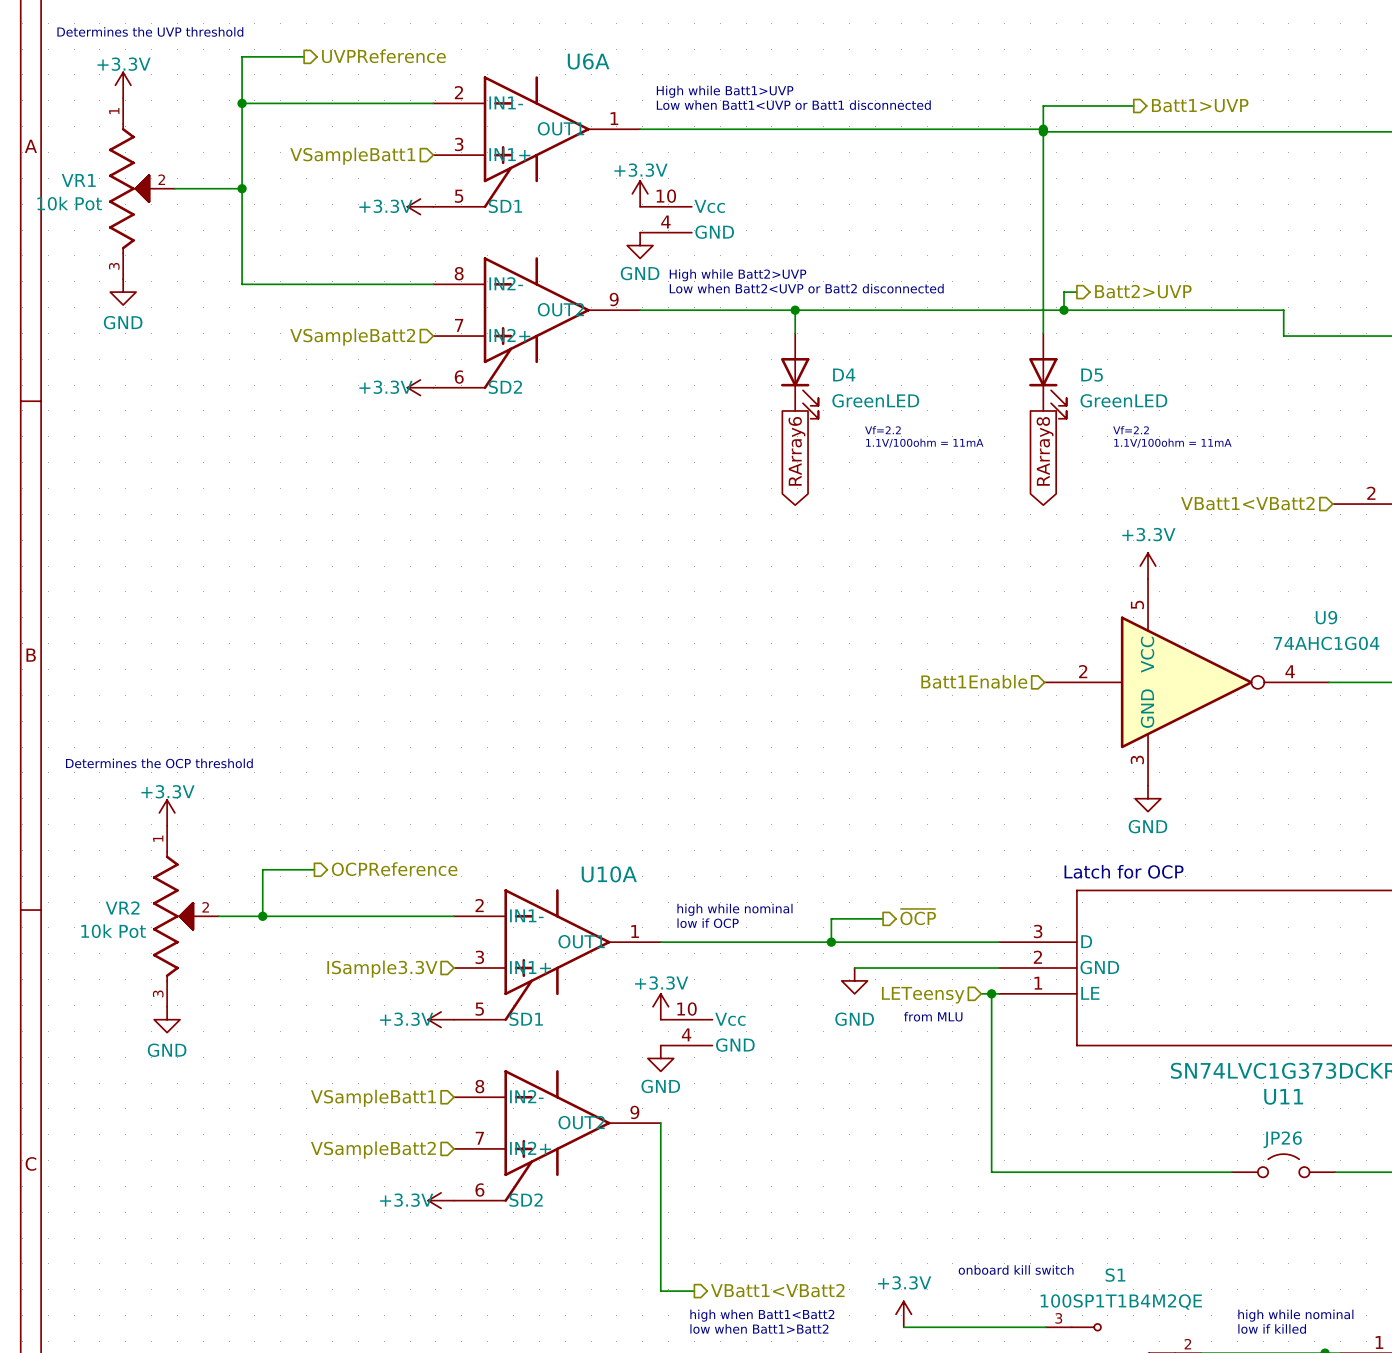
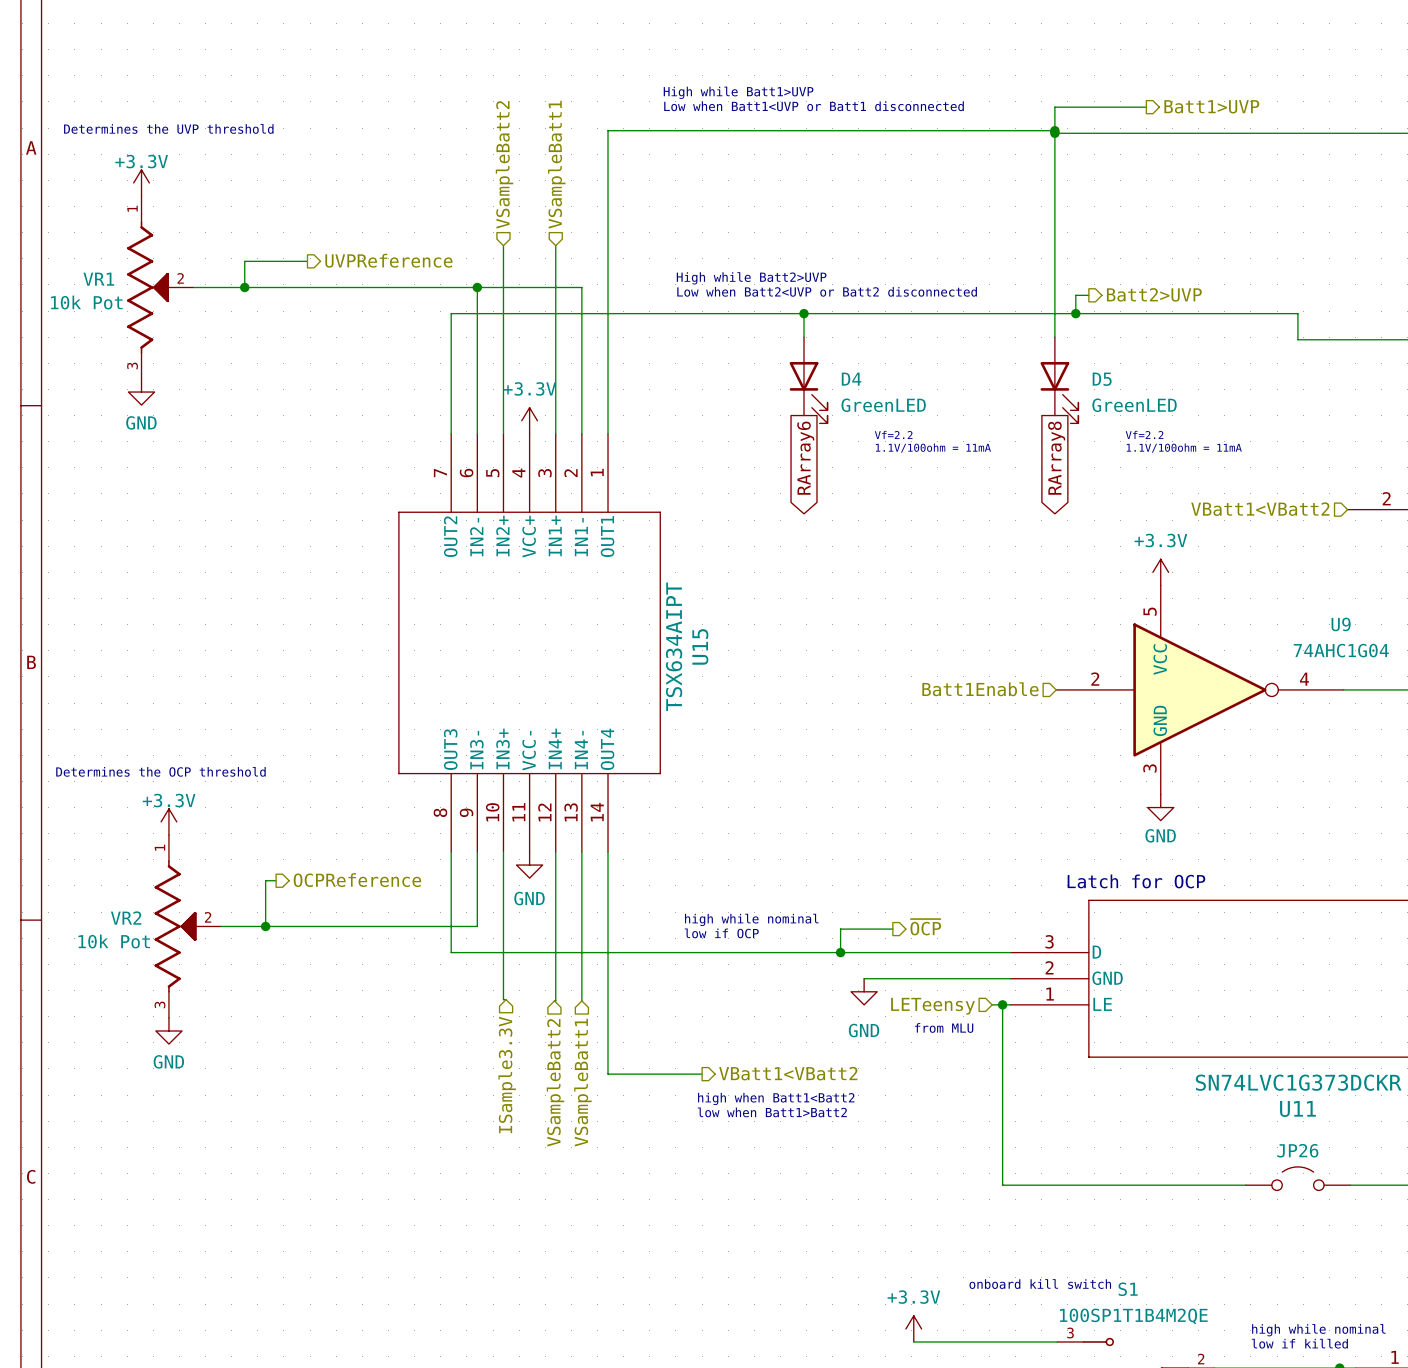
text position: Determines the UVP threshold (150, 31) -> Determines the UVP threshold (168, 128)
wire: (304, 56) (242, 56) (242, 258) -> (307, 261) (244, 261)
hierarchical label position: UVPReference (383, 56) -> UVPReference (388, 260)
power symbol position: +3.3V (123, 85) -> +3.3V (141, 182)
wire: (242, 103) (433, 103) -> none
junction: (242, 103) -> none
wire: none -> (647, 130) (608, 130) (608, 433)
hierarchical label rotation: 0° (352, 156) -> 90° clockwise (556, 164)
hierarchical label position: VSampleBatt1 (352, 156) -> VSampleBatt1 (556, 164)
VR1 position: (141, 188) -> (160, 287)
wire: (174, 188) (242, 188) -> none
junction: (242, 188) -> none
power symbol: +3.3V (640, 193) -> none
power symbol: +3.3V (420, 206) -> none
U6A: (562, 232) -> none
wire: none -> (503, 245) (503, 433)
wire: none -> (555, 245) (555, 433)
power symbol: GND (640, 245) -> none
wire: none -> (193, 287) (244, 287)
junction: none -> (244, 287)
wire: none -> (438, 287) (581, 287) (581, 433)
wire: none -> (477, 287) (477, 433)
junction: none -> (477, 287)
power symbol position: GND (123, 292) -> GND (141, 392)
wire: none -> (647, 313) (451, 313) (451, 433)
hierarchical label rotation: 0° (352, 337) -> 90° clockwise (504, 164)
hierarchical label position: VSampleBatt2 (352, 337) -> VSampleBatt2 (504, 164)
power symbol rotation: 0° (420, 387) -> 90° clockwise (529, 420)
power symbol position: +3.3V (420, 387) -> +3.3V (529, 420)
U15: none -> TSX634AIPT (529, 642)
wire: none -> (451, 851) (451, 952) (668, 952)
wire: none -> (477, 851) (477, 926) (459, 926)
wire: none -> (503, 851) (503, 999) (506, 999)
wire: none -> (555, 851) (554, 1000)
wire: none -> (581, 851) (581, 1000)
wire: none -> (608, 851) (608, 1074) (702, 1074)
wire: (314, 869) (262, 871) -> (276, 880) (265, 880)
hierarchical label position: OCPReference (394, 869) -> OCPReference (357, 880)
hierarchical label rotation: 0° (382, 969) -> 90° counterclockwise (507, 1074)
hierarchical label position: ISample3.3V (382, 969) -> ISample3.3V (507, 1074)
power symbol: +3.3V (660, 1006) -> none
power symbol: +3.3V (441, 1019) -> none
U10A: (583, 1045) -> none
power symbol position: GND (660, 1058) -> GND (529, 865)
power symbol text position: GND (660, 1086) -> GND (529, 898)
hierarchical label rotation: 0° (373, 1098) -> 90° counterclockwise (582, 1082)
hierarchical label position: VSampleBatt1 (373, 1098) -> VSampleBatt1 (582, 1082)
wire: (660, 1123) (660, 1291) (694, 1291) -> none
hierarchical label rotation: 0° (373, 1150) -> 90° counterclockwise (555, 1082)
hierarchical label position: VSampleBatt2 (373, 1150) -> VSampleBatt2 (555, 1082)
power symbol: +3.3V (441, 1200) -> none
hierarchical label position: VBatt1<VBatt2 (777, 1290) -> VBatt1<VBatt2 (788, 1073)
text position: high when Batt1<Batt2 (762, 1315) -> high when Batt1<Batt2 (776, 1098)
text position: low when Batt1>Batt2 (759, 1328) -> low when Batt1>Batt2 (772, 1112)

